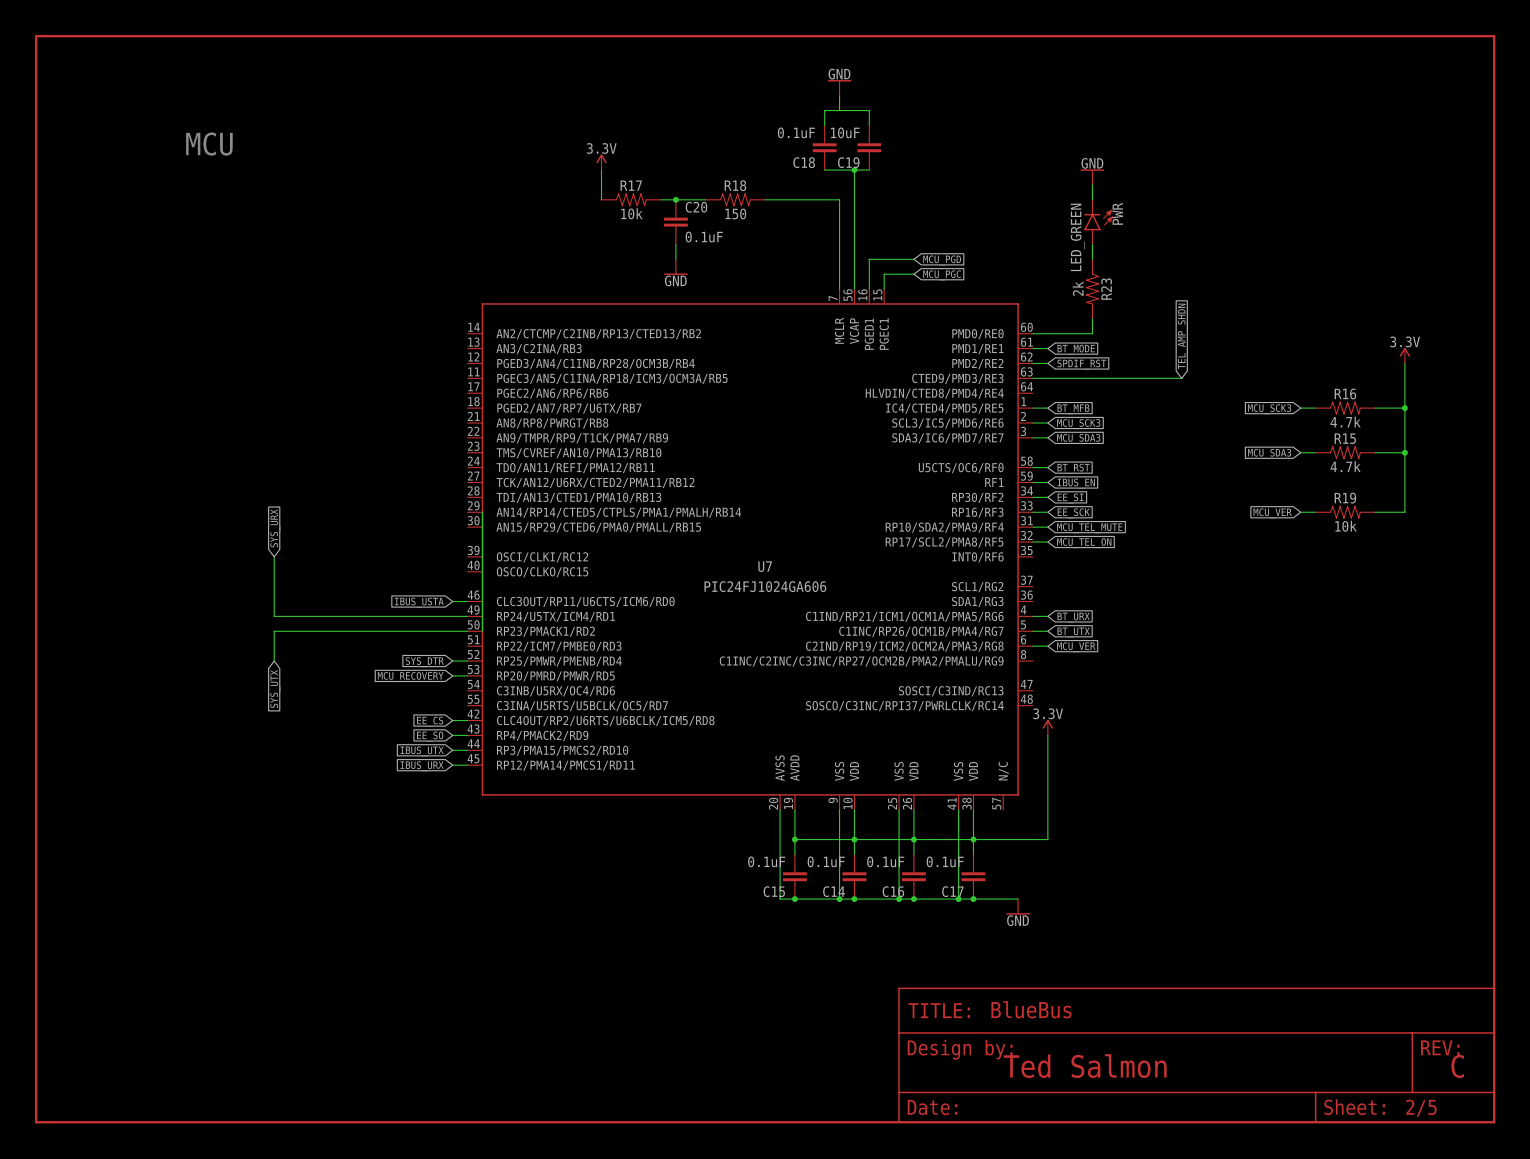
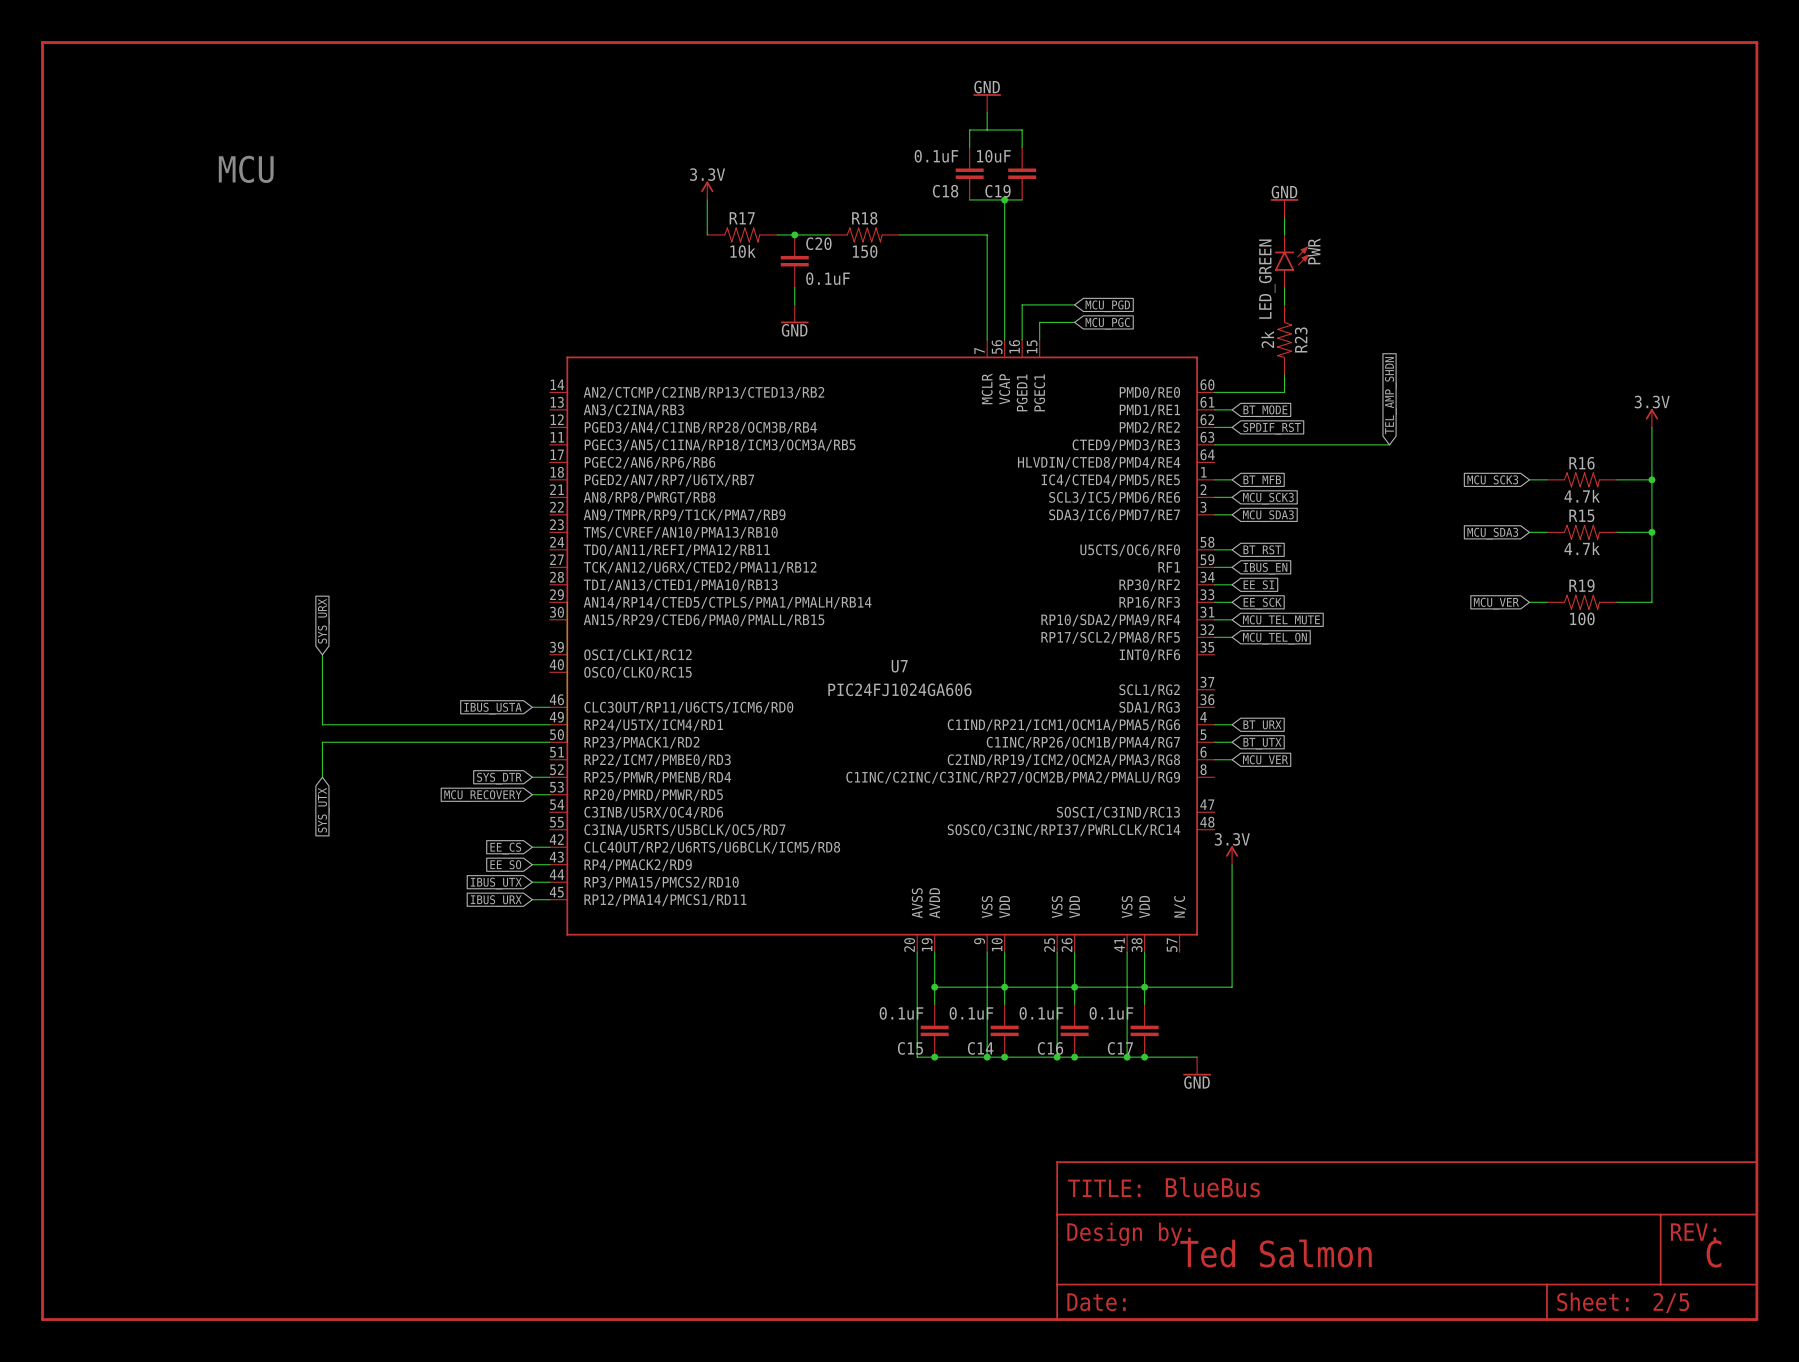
R19 value: 10k (1346, 526) -> 100 (1582, 618)

